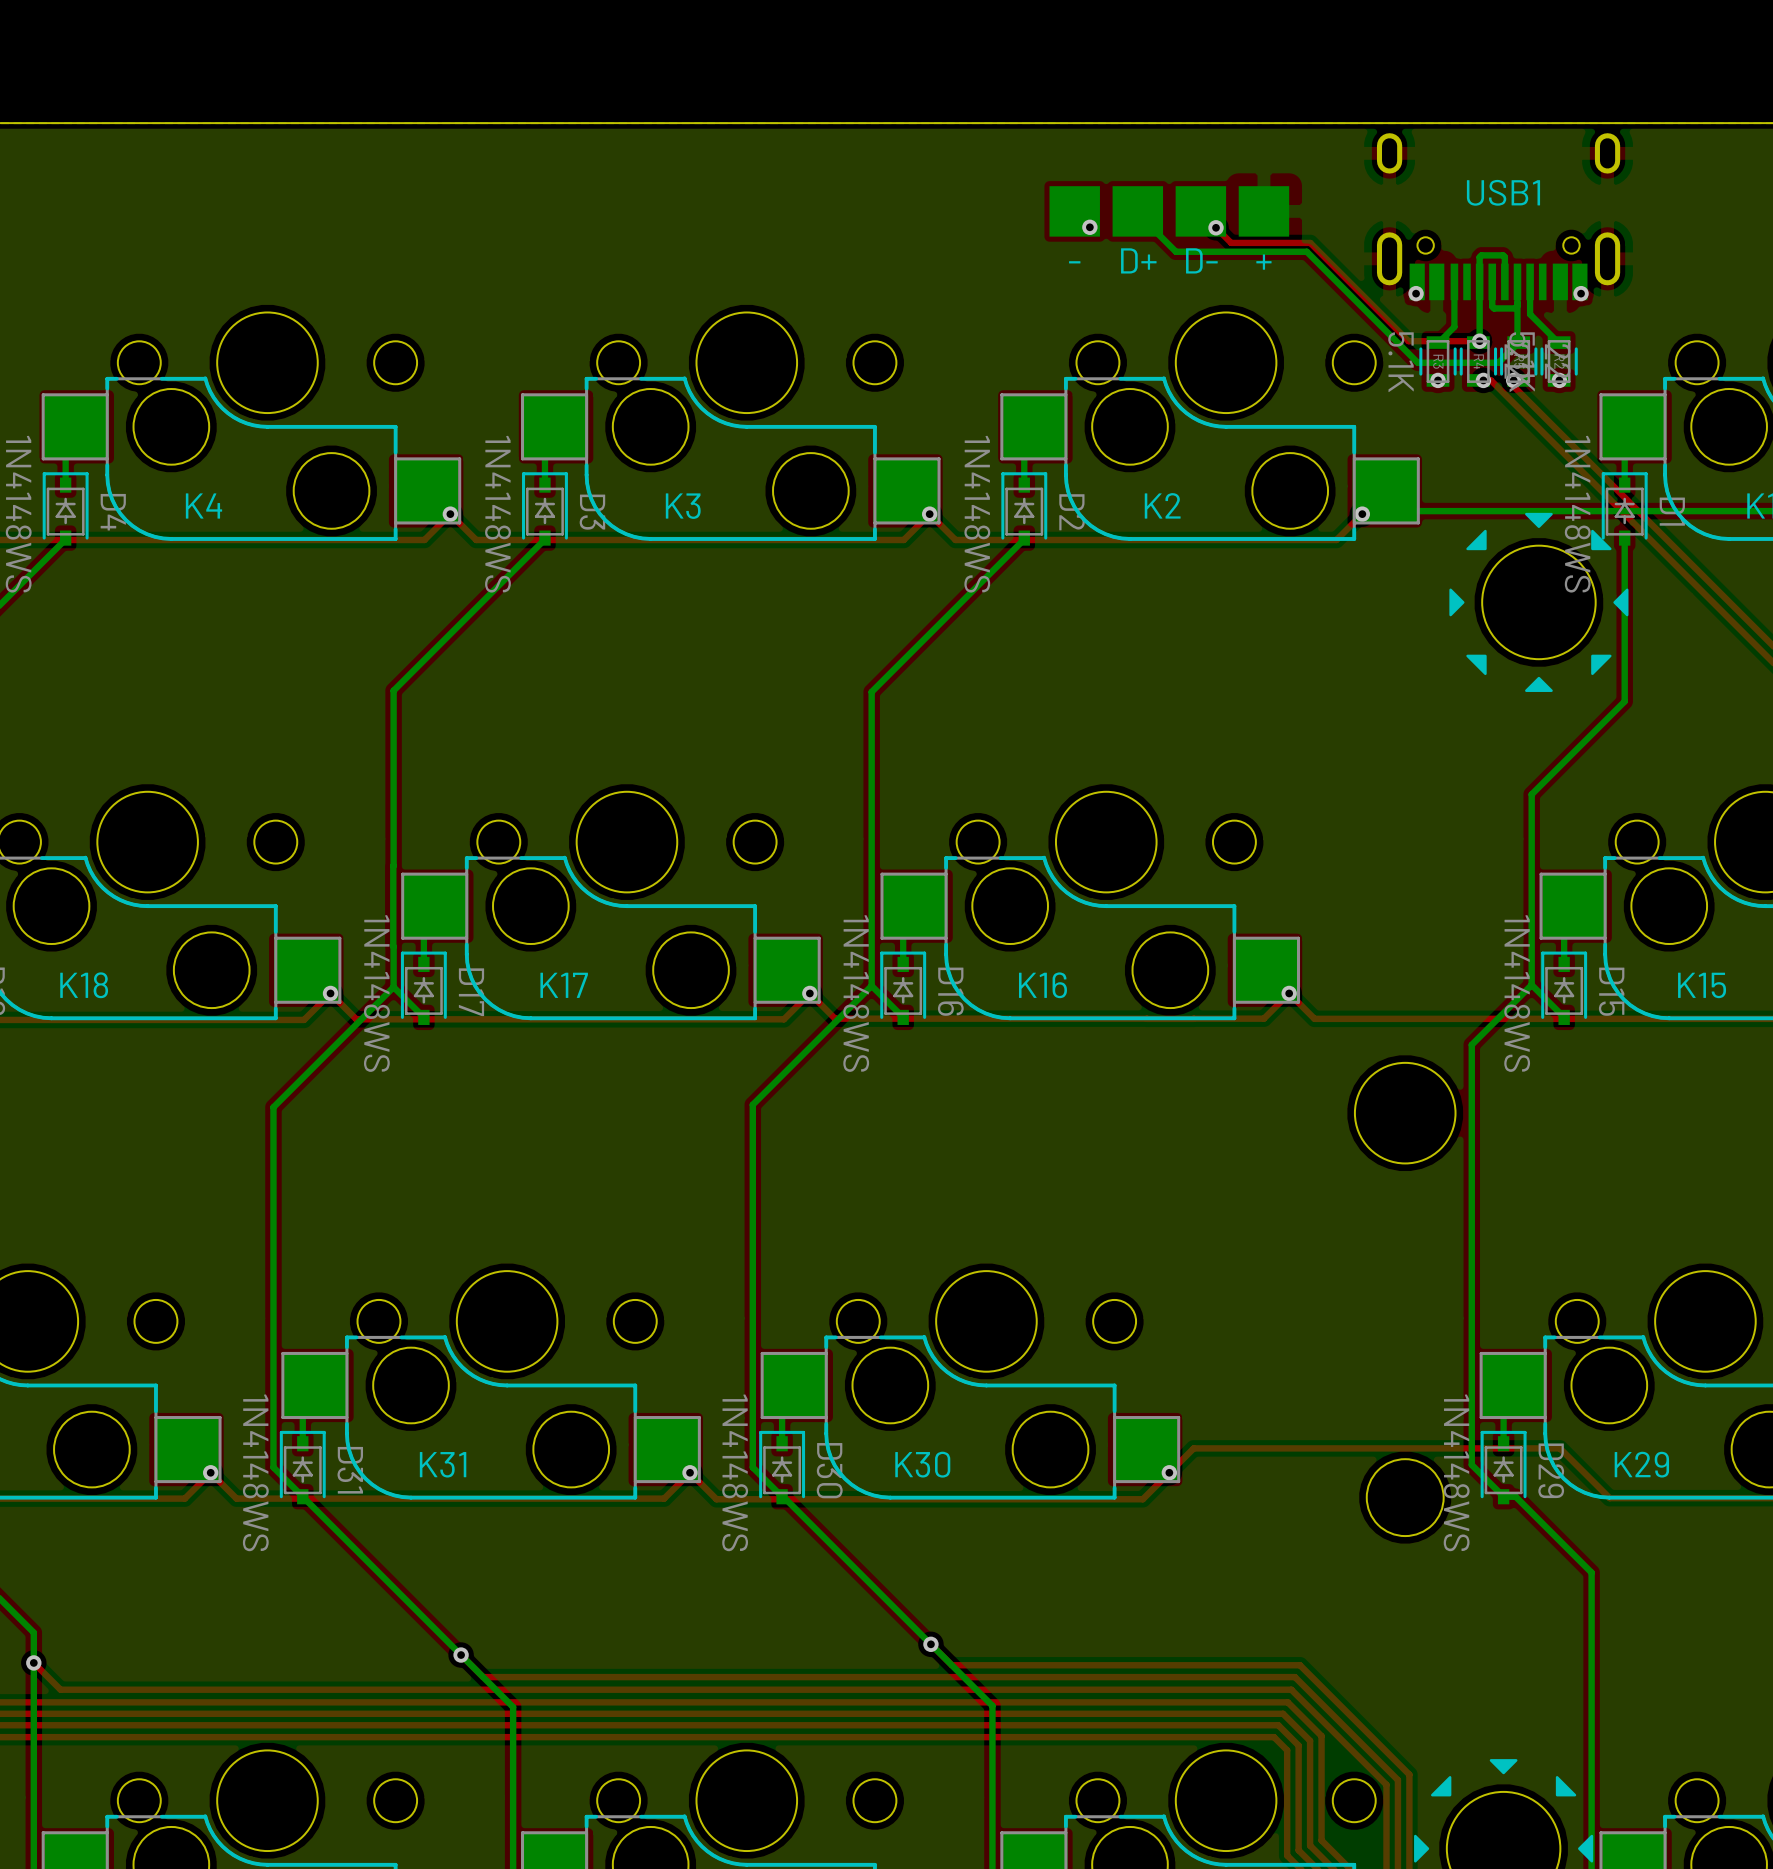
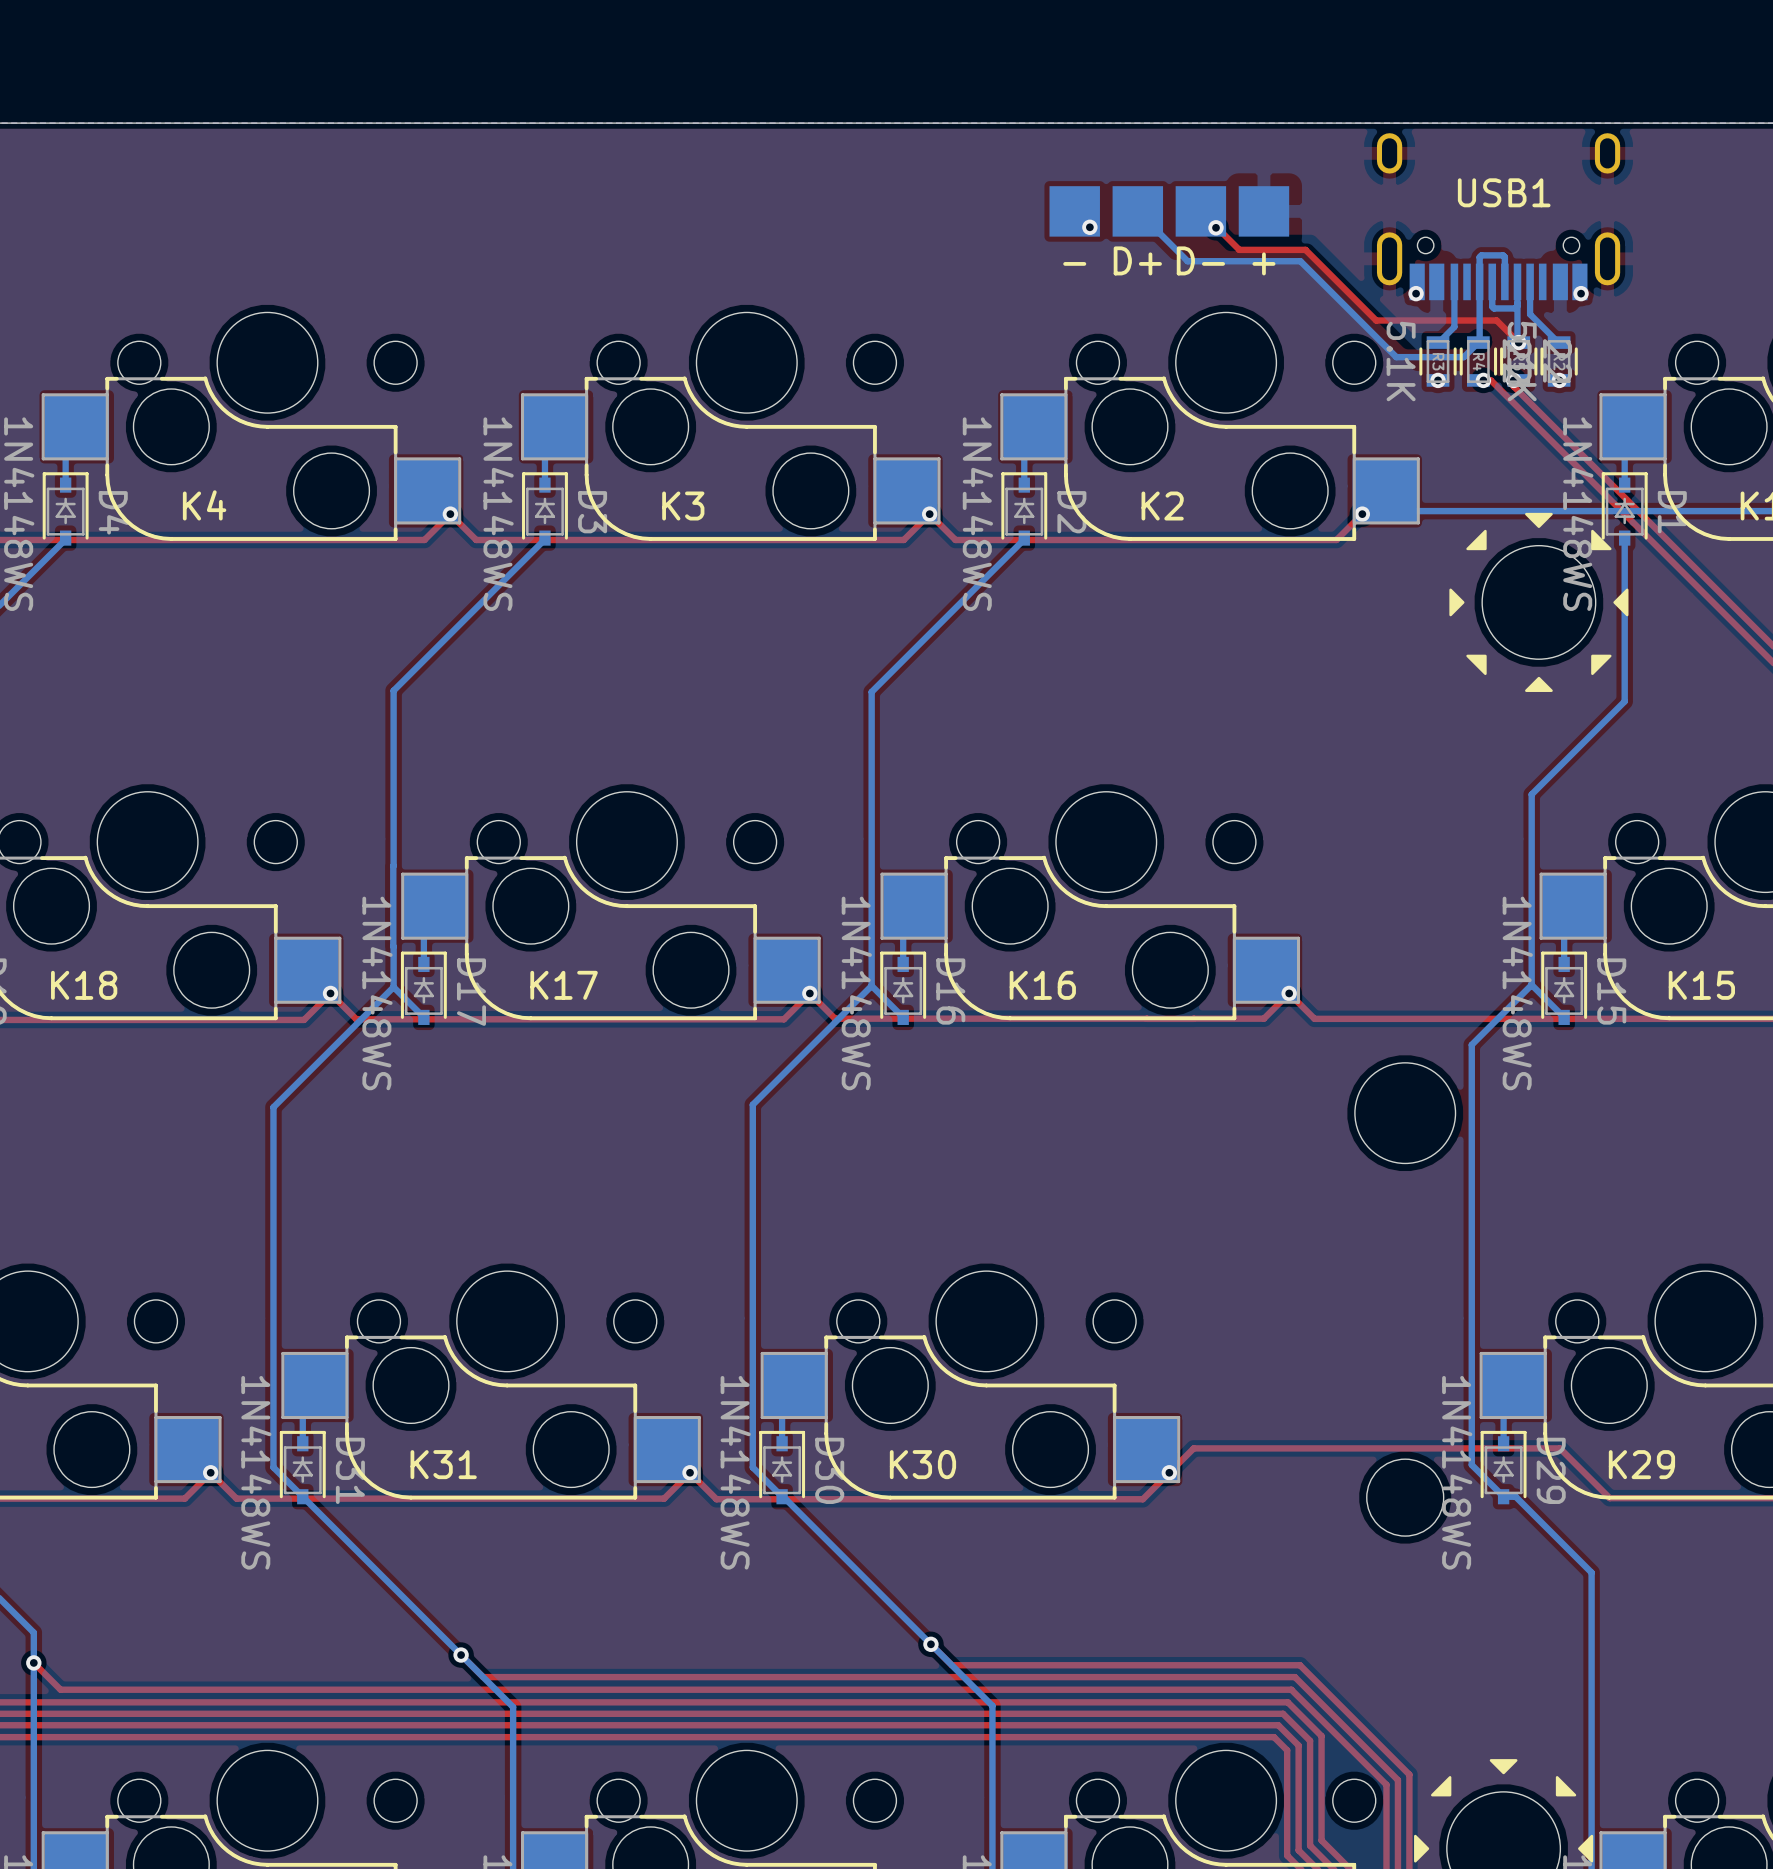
bottom track: (1137, 211) (1137, 213) (1175, 251) (1306, 251) (1417, 362) (1498, 362) (1518, 342) -> (1137, 211) (1187, 261) (1300, 261) (1396, 357) (1463, 357) (1478, 342)
top track: (1216, 227) (1231, 242) (1310, 242) (1408, 341) (1479, 341) -> none
top track: none -> (1217, 227) (1239, 249) (1305, 249) (1376, 320) (1496, 320) (1518, 342)
via position: (1479, 341) -> (1518, 342)

